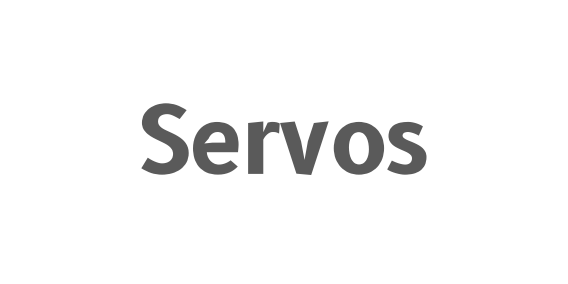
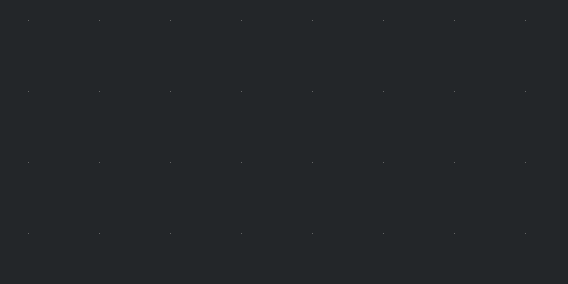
text: Servos (283, 139) -> none

